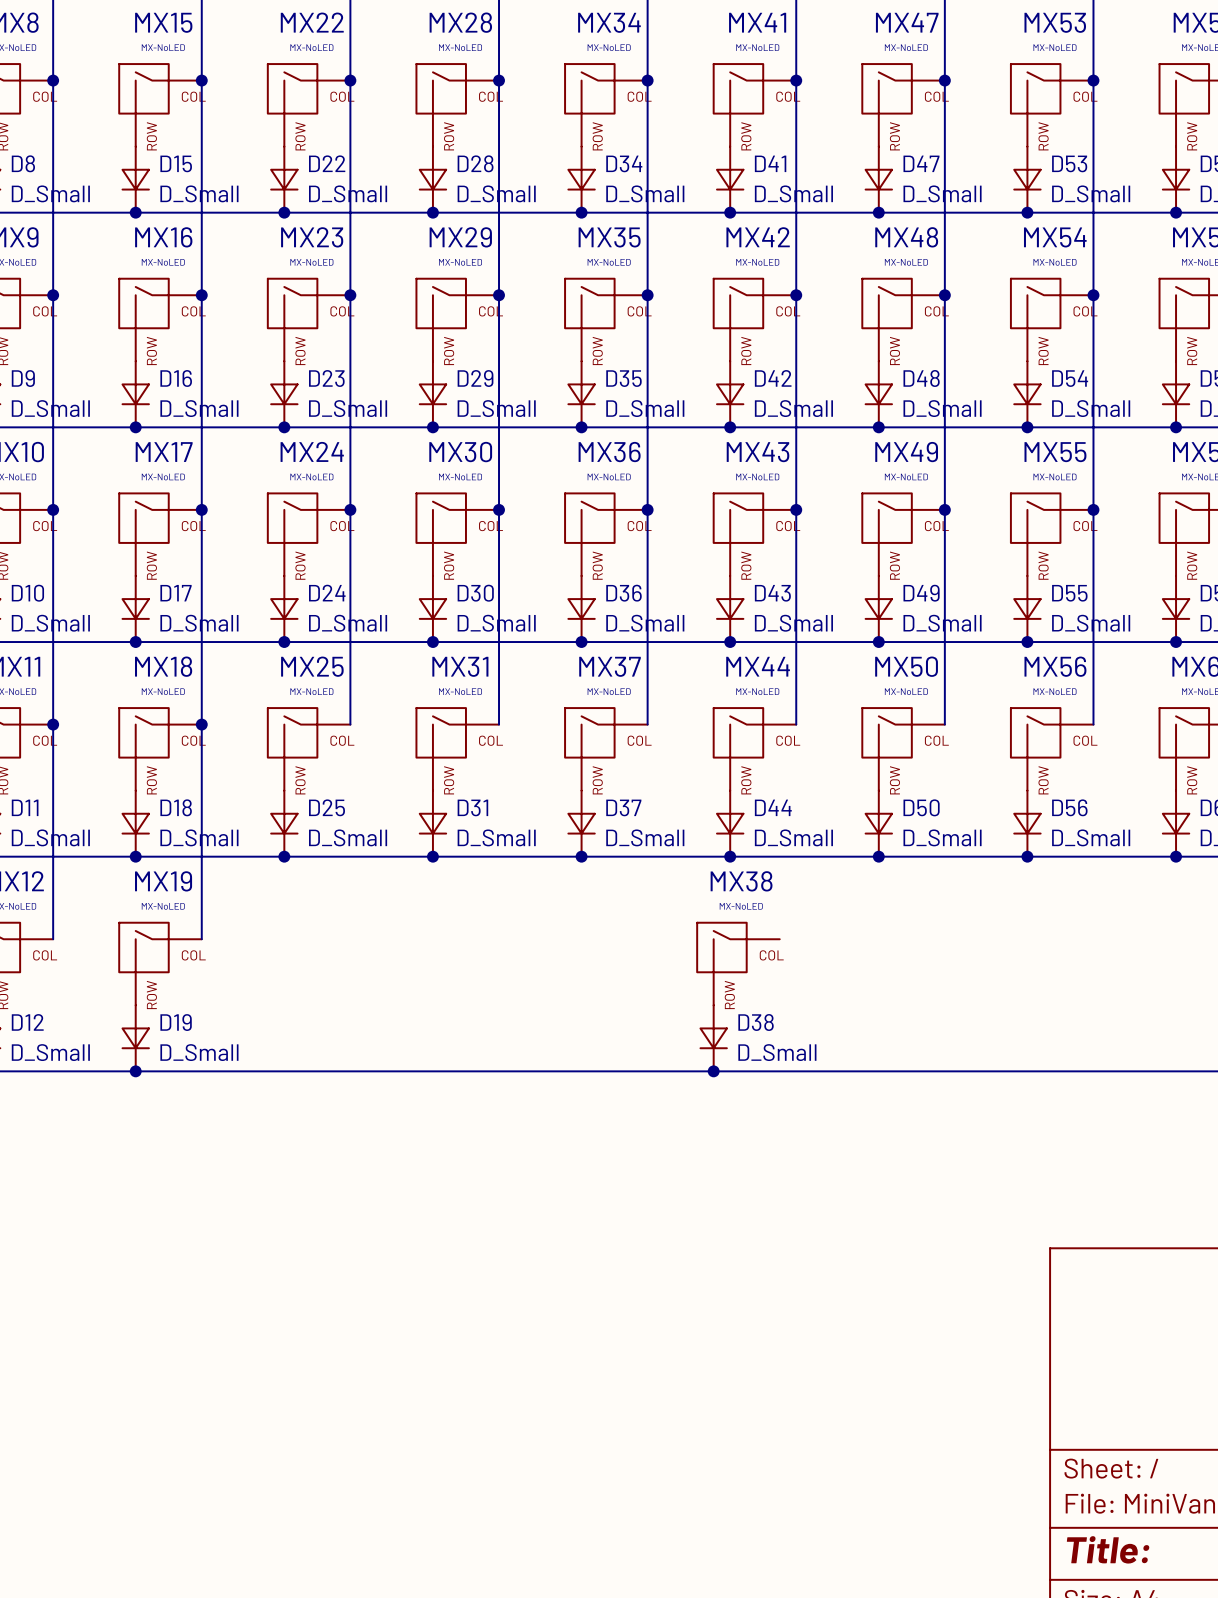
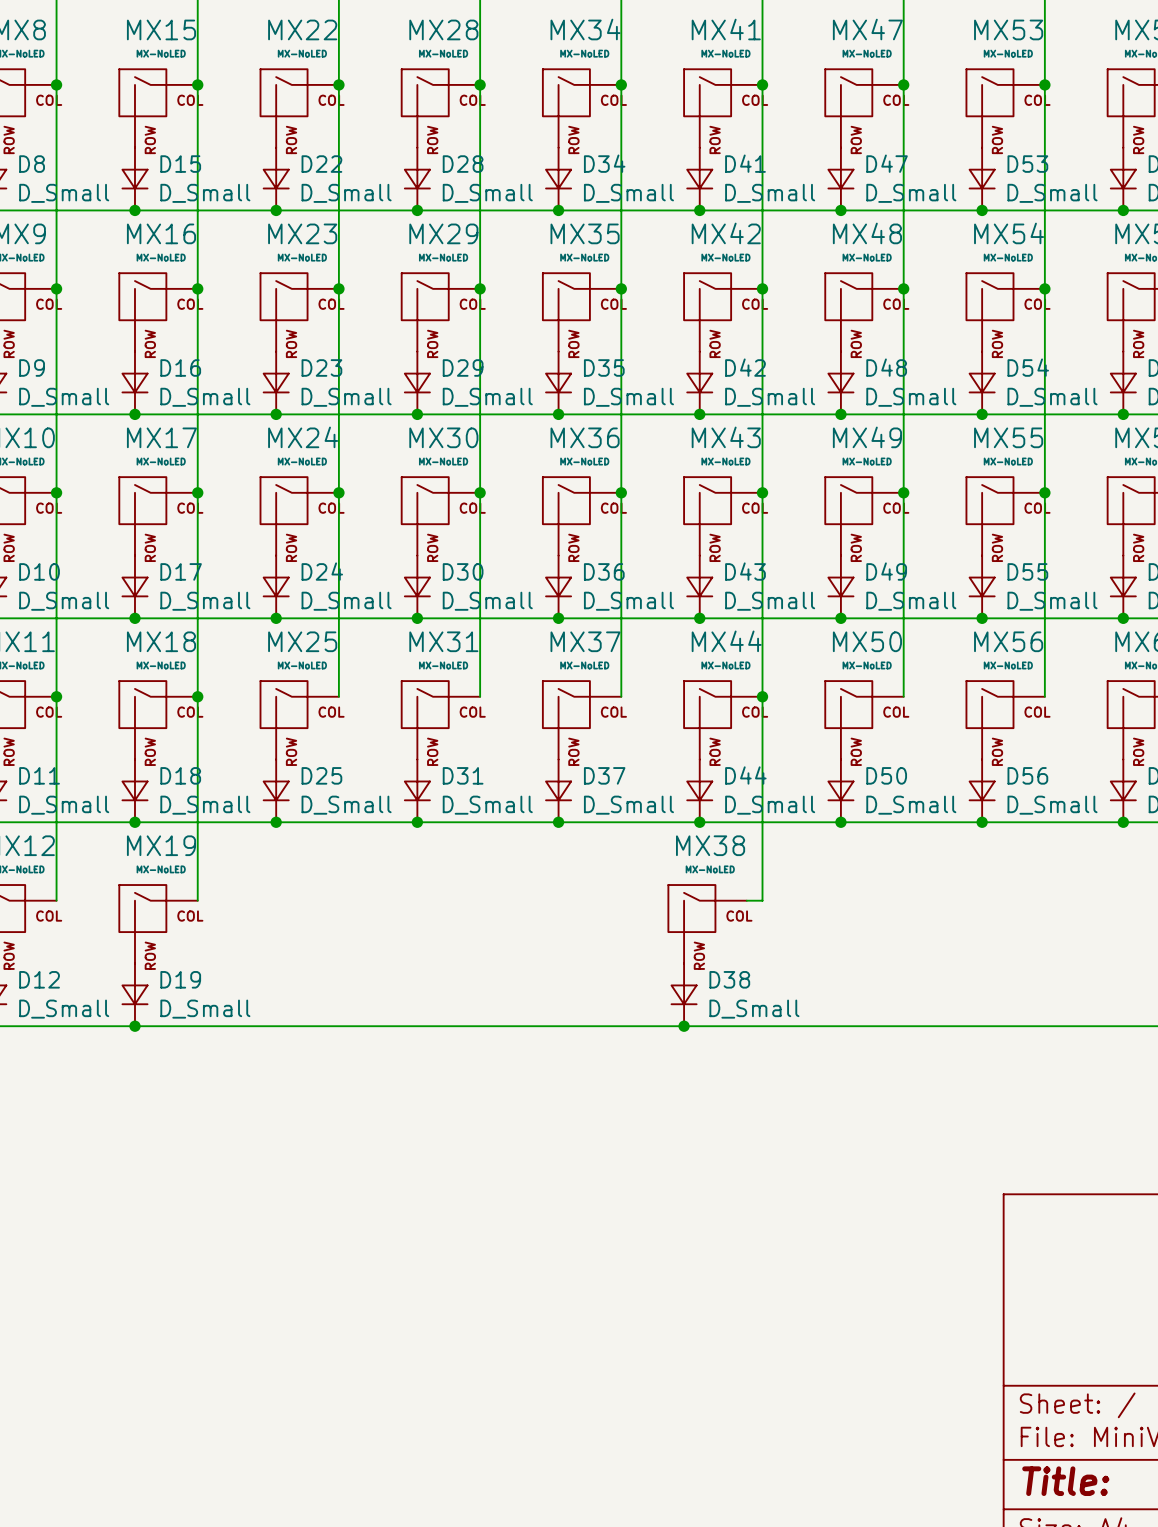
wire: none -> (762, 696) (762, 900) (746, 900)
junction: none -> (762, 696)

